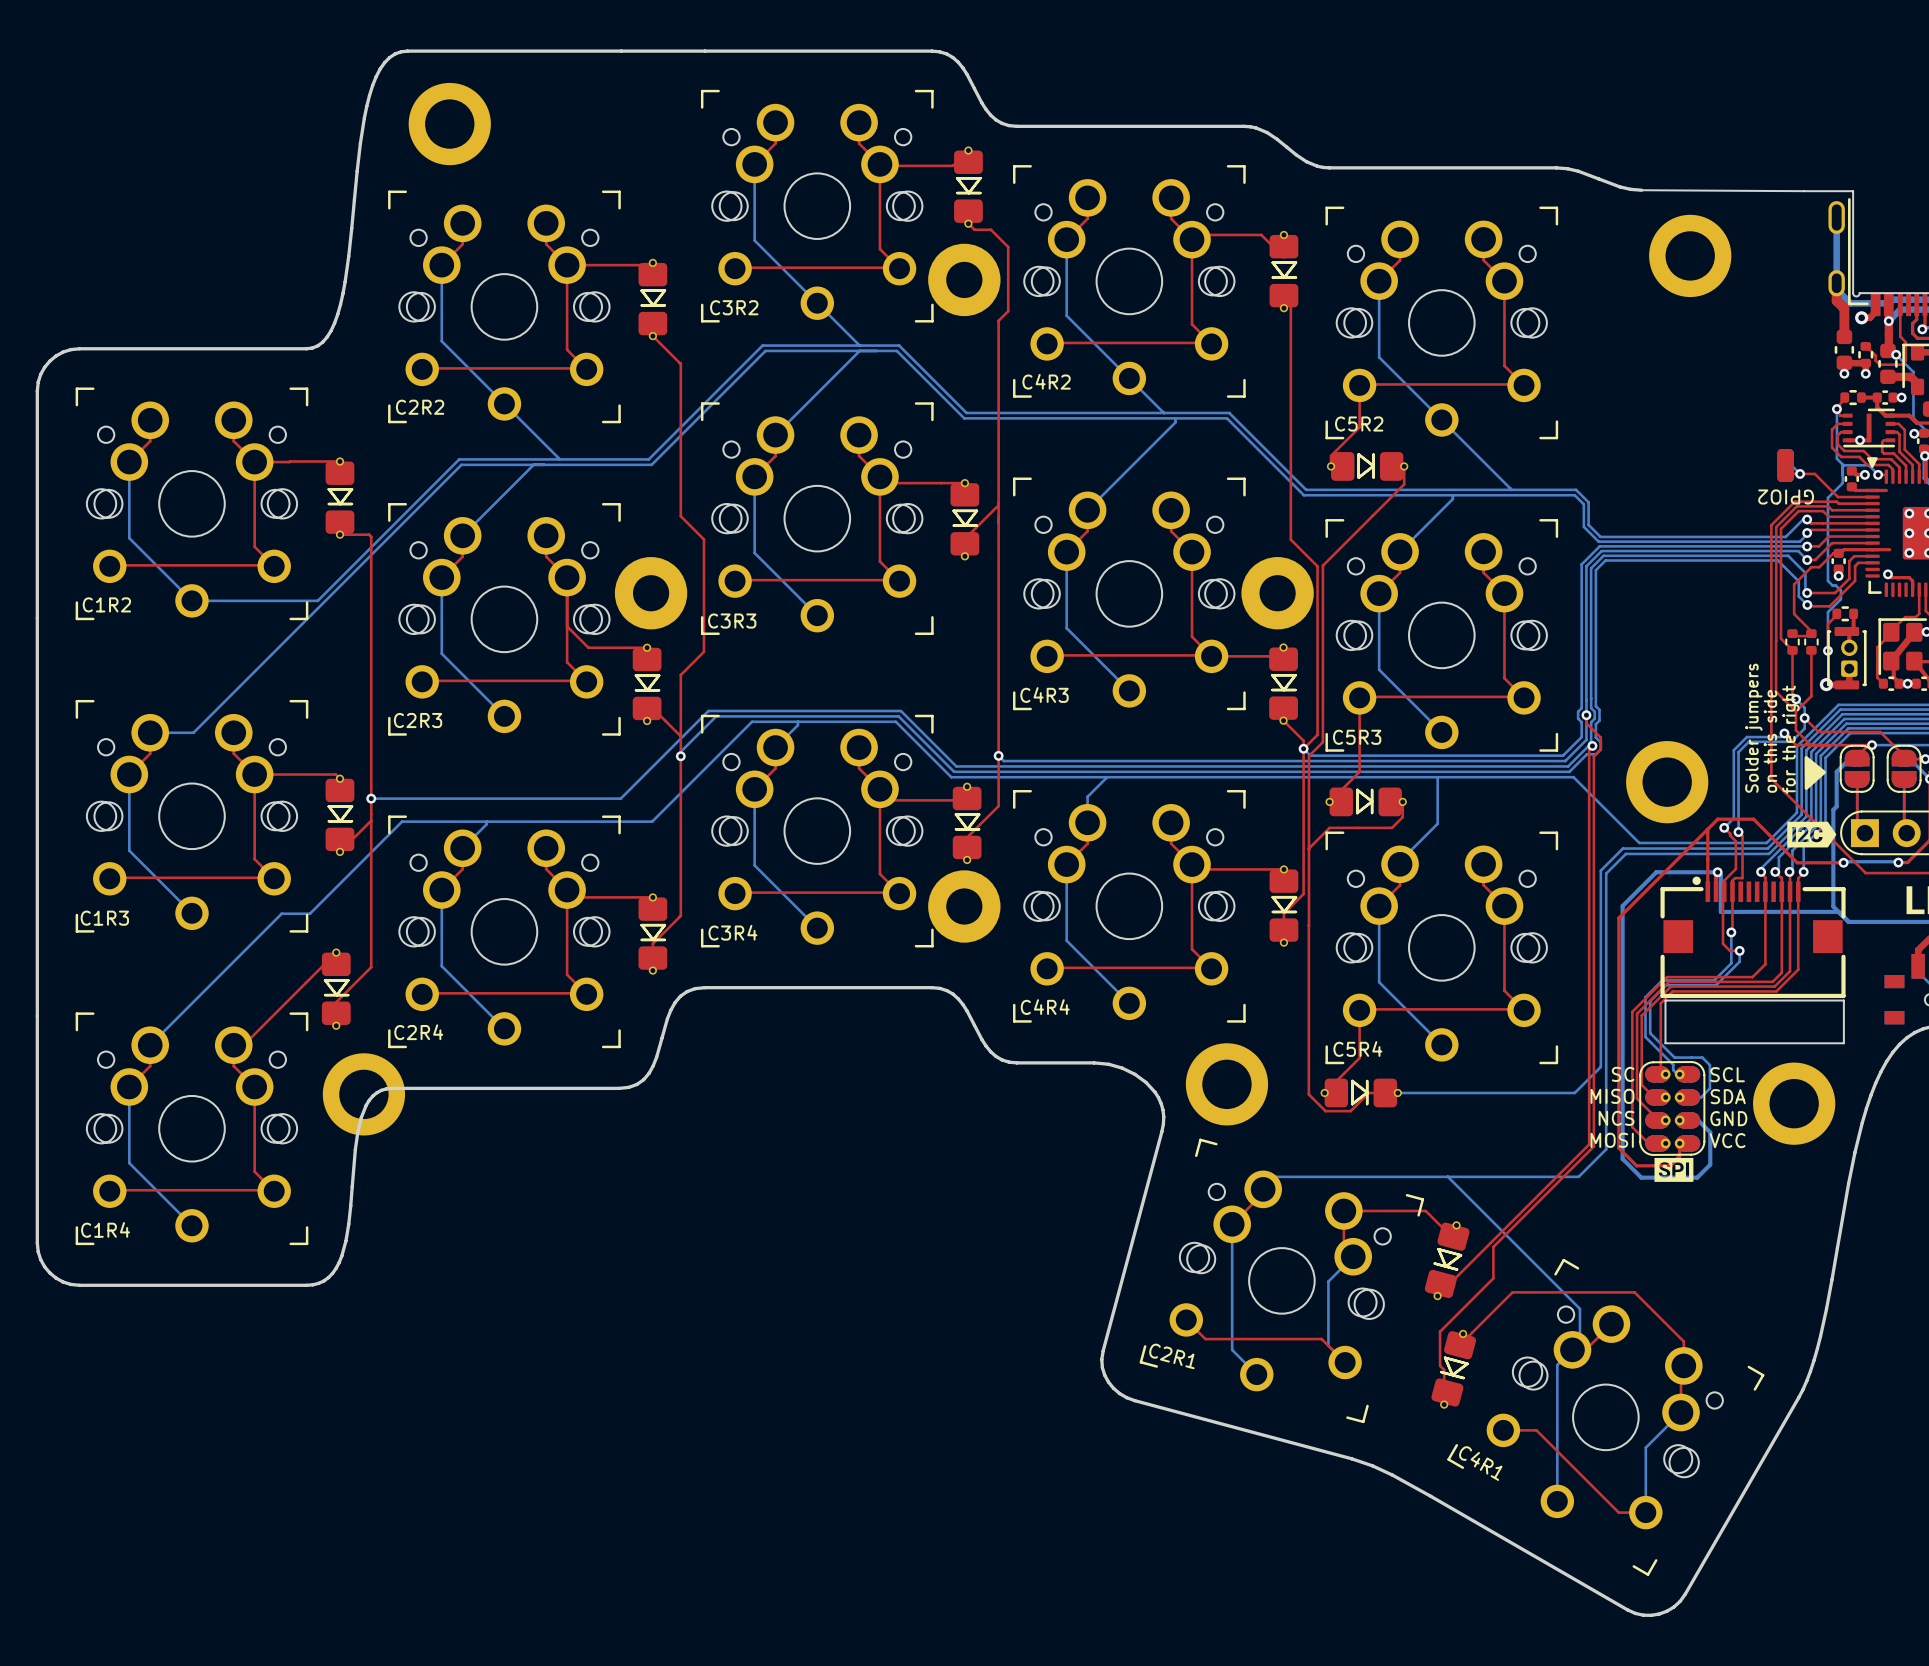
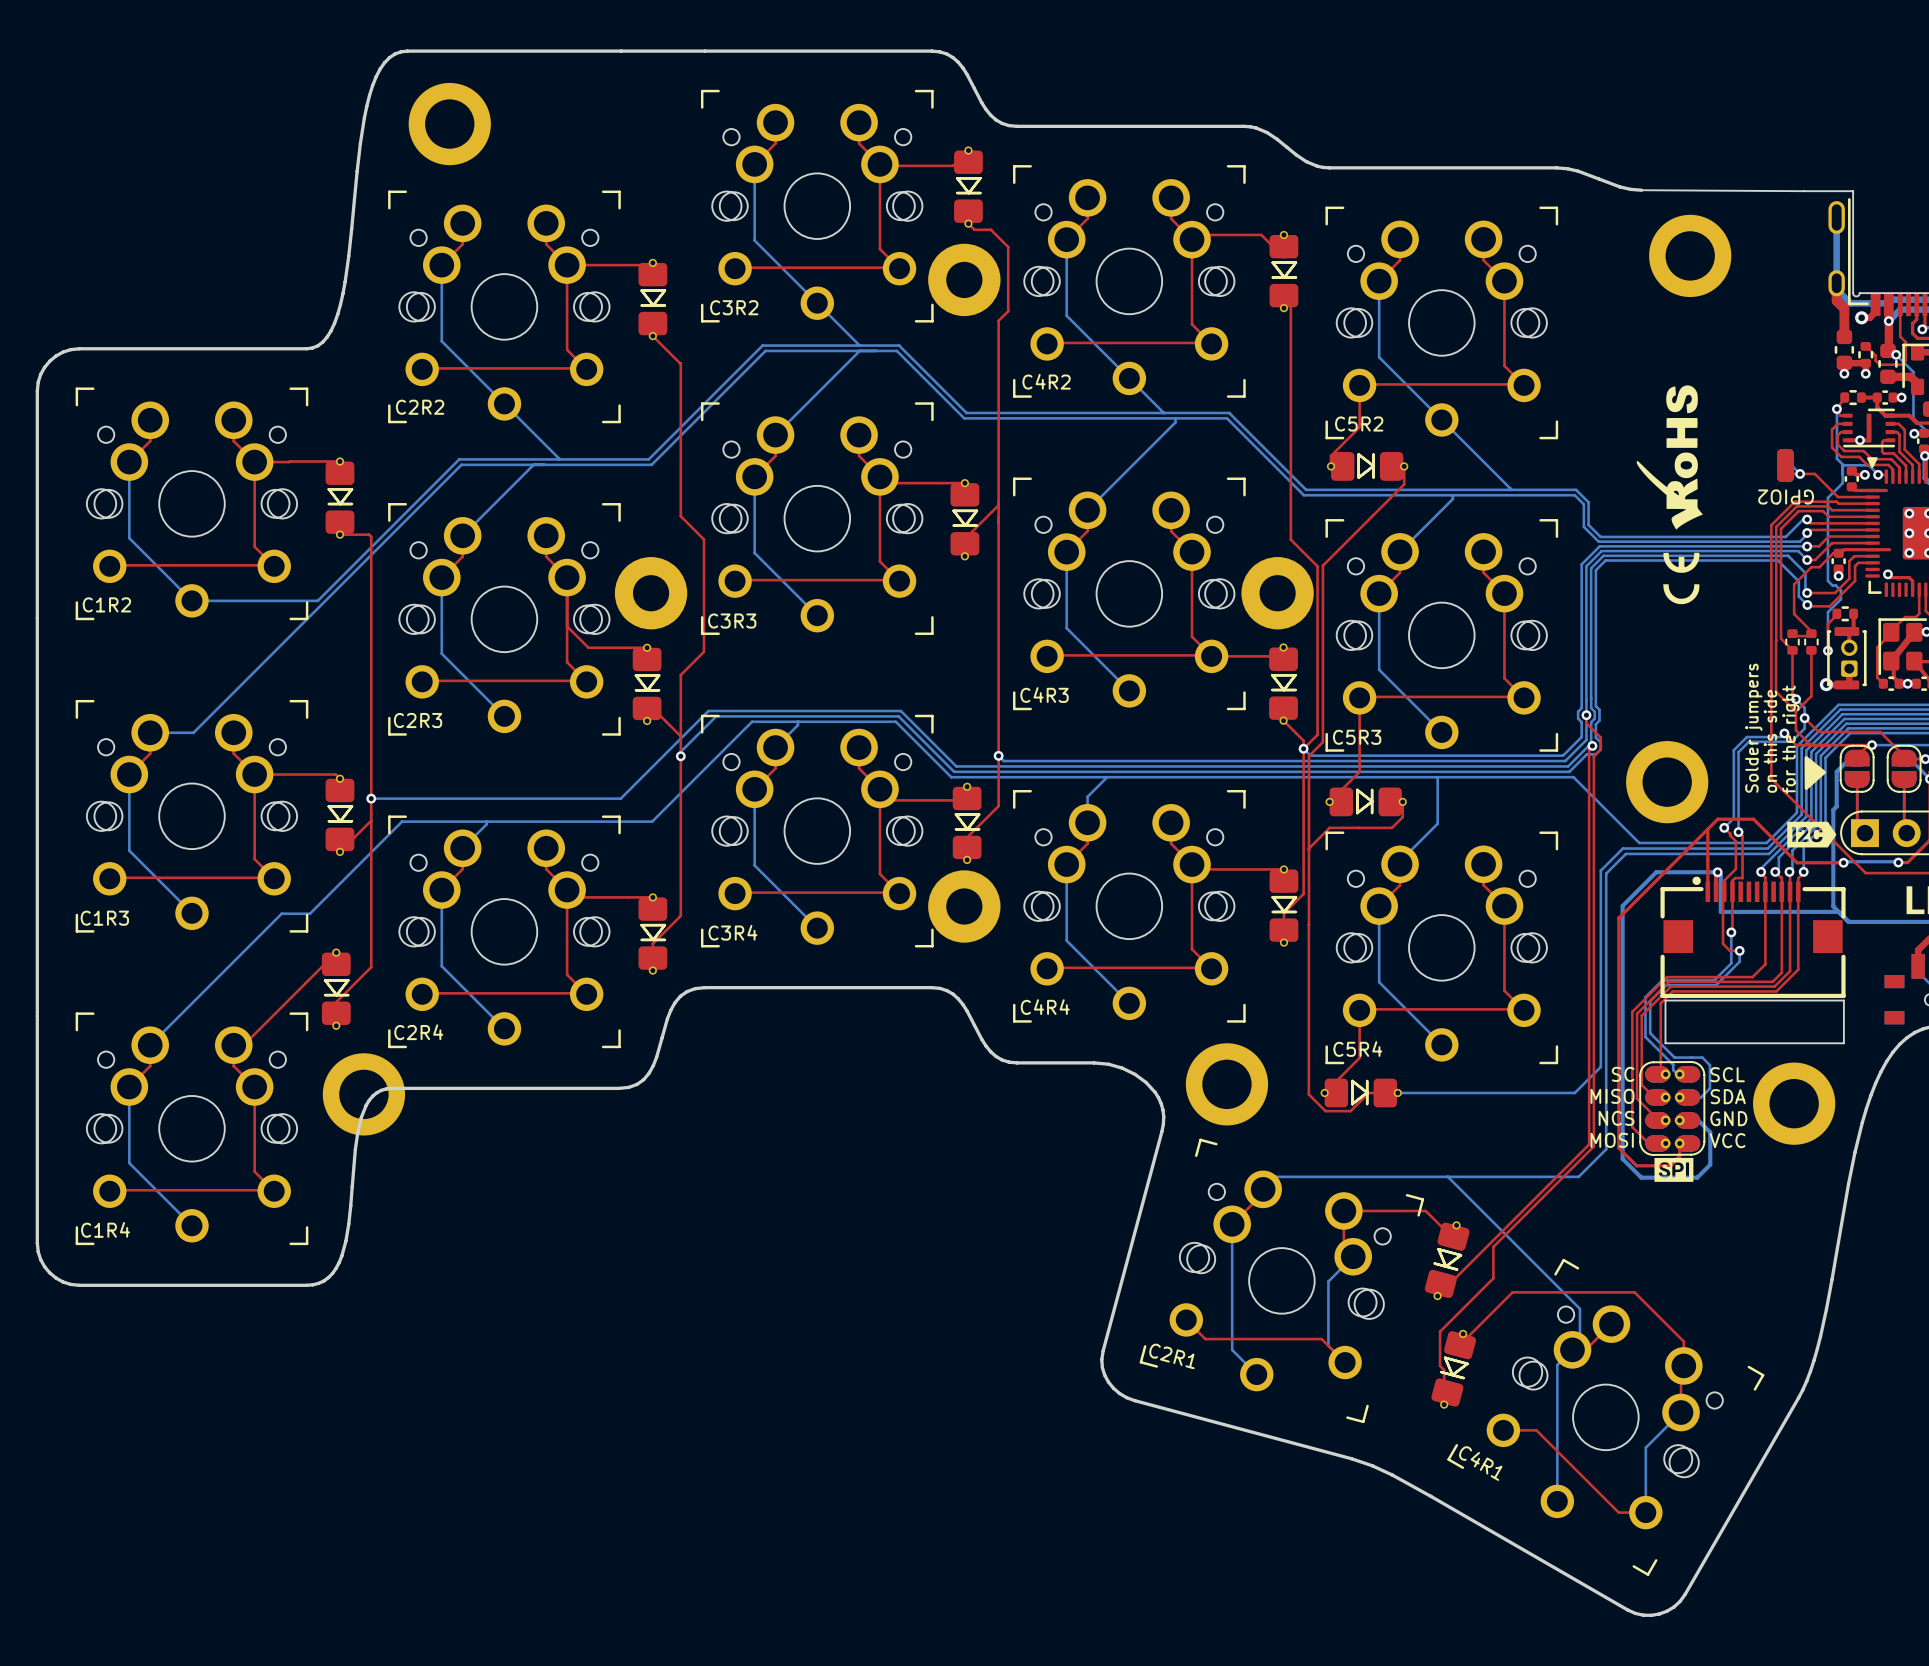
drawing: none -> [1636, 385, 1703, 605]

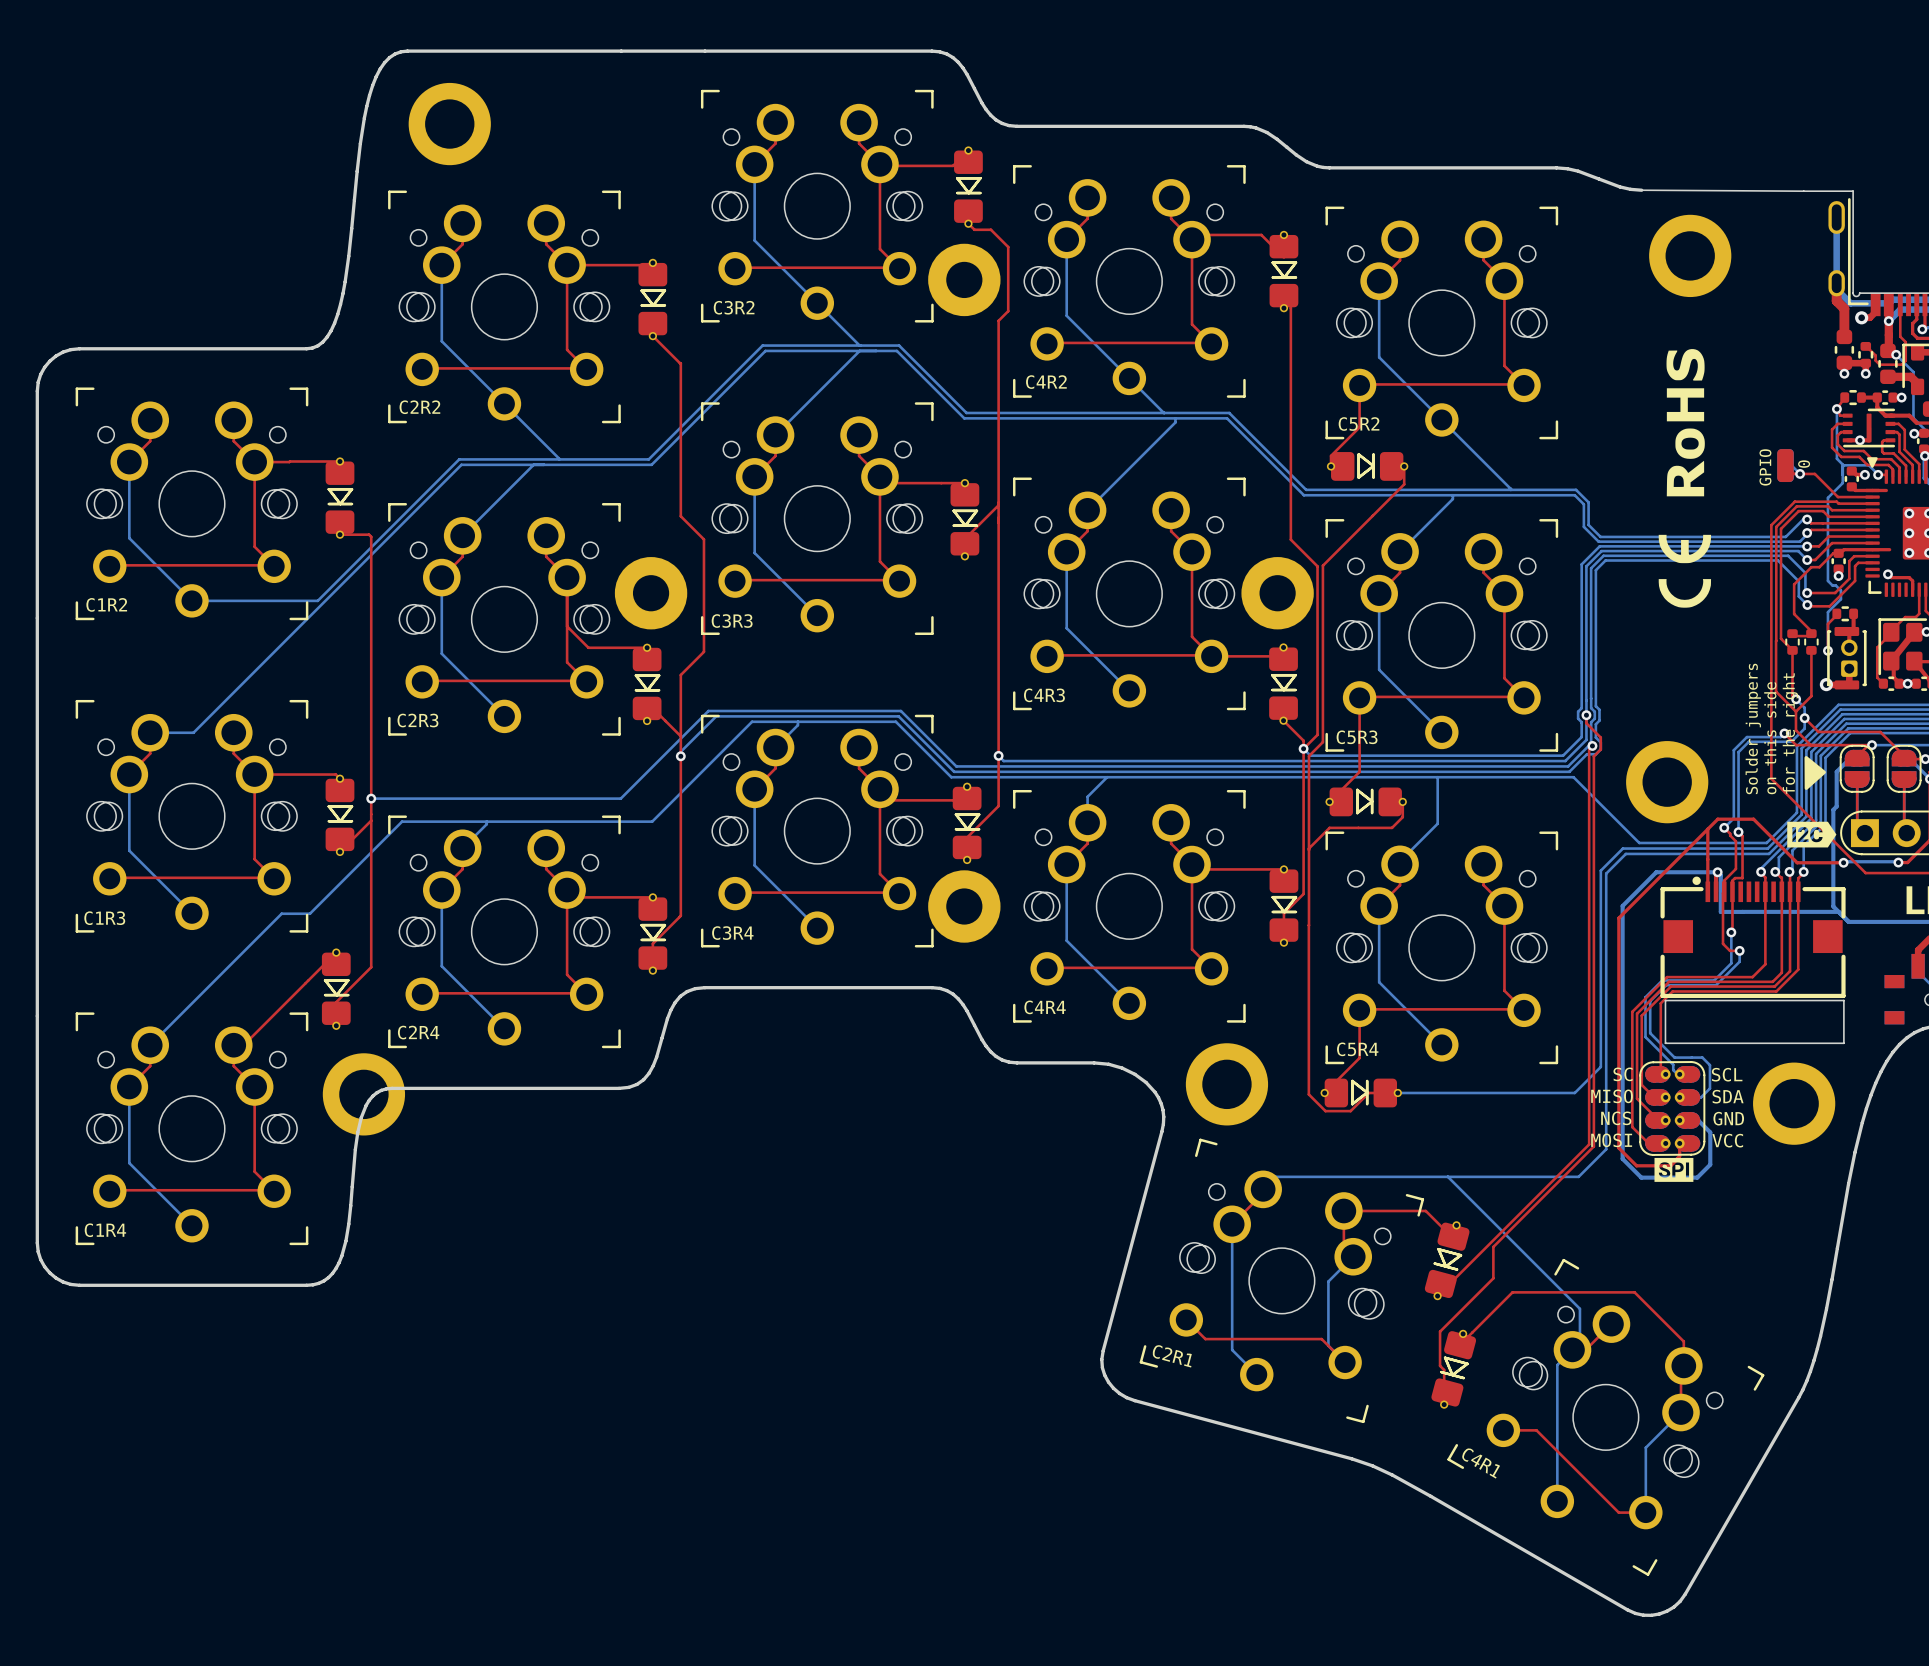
drawing: none -> [1666, 349, 1705, 497]
drawing: [1636, 385, 1703, 605] -> none
text: none -> 0 (1804, 464)
text: GPIO2 (1786, 496) -> GPIO (1765, 467)
drawing: none -> [1658, 534, 1712, 608]

